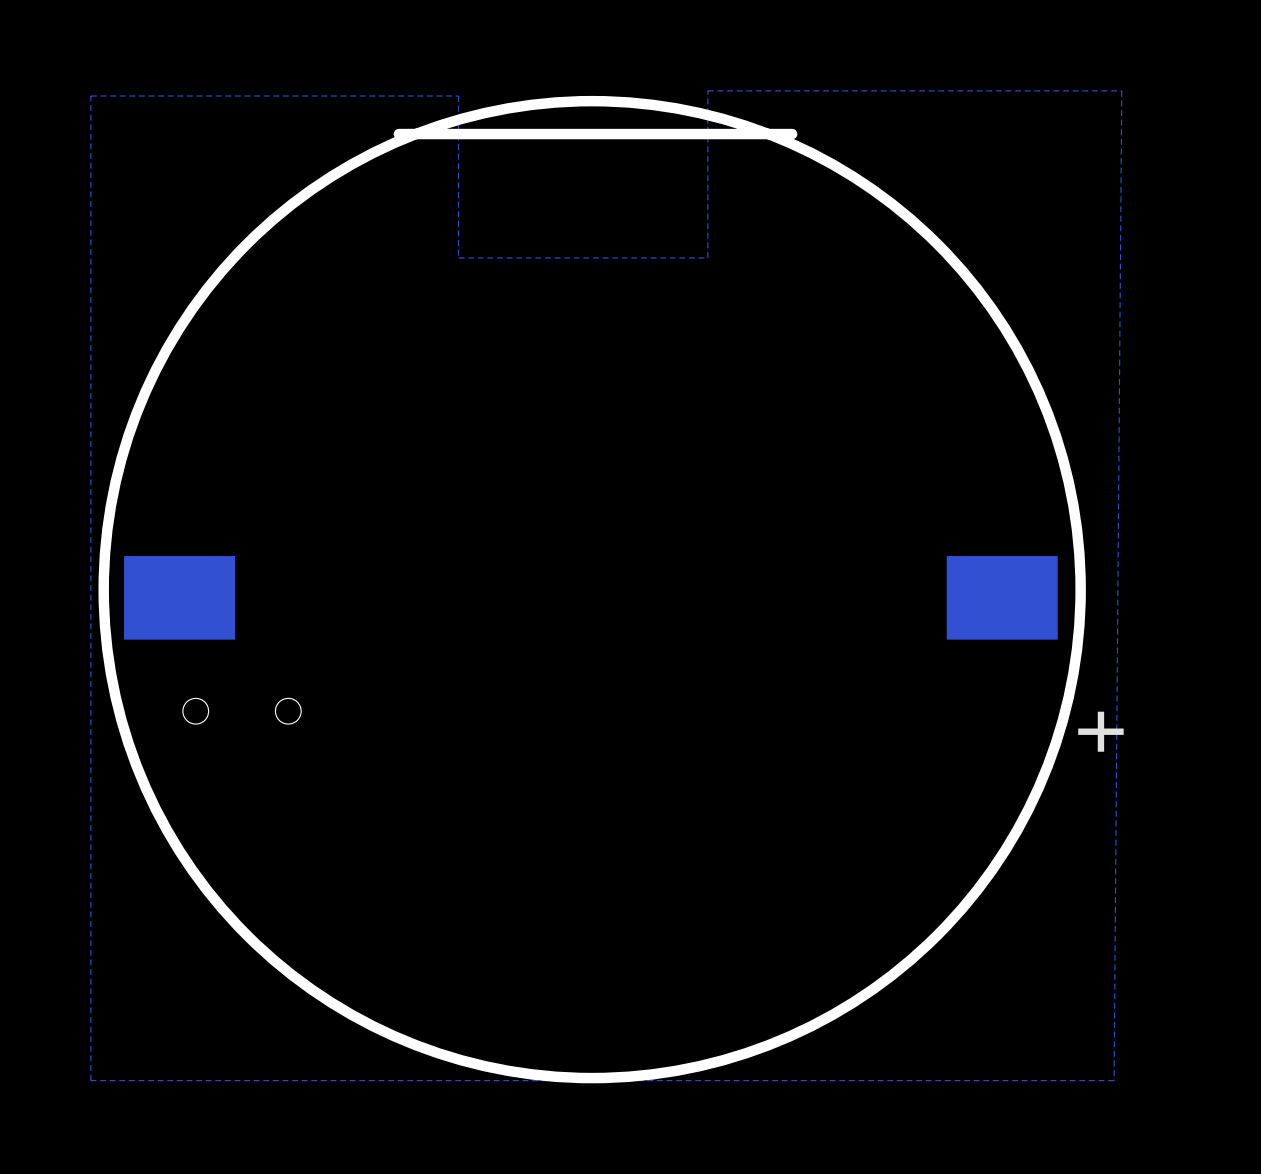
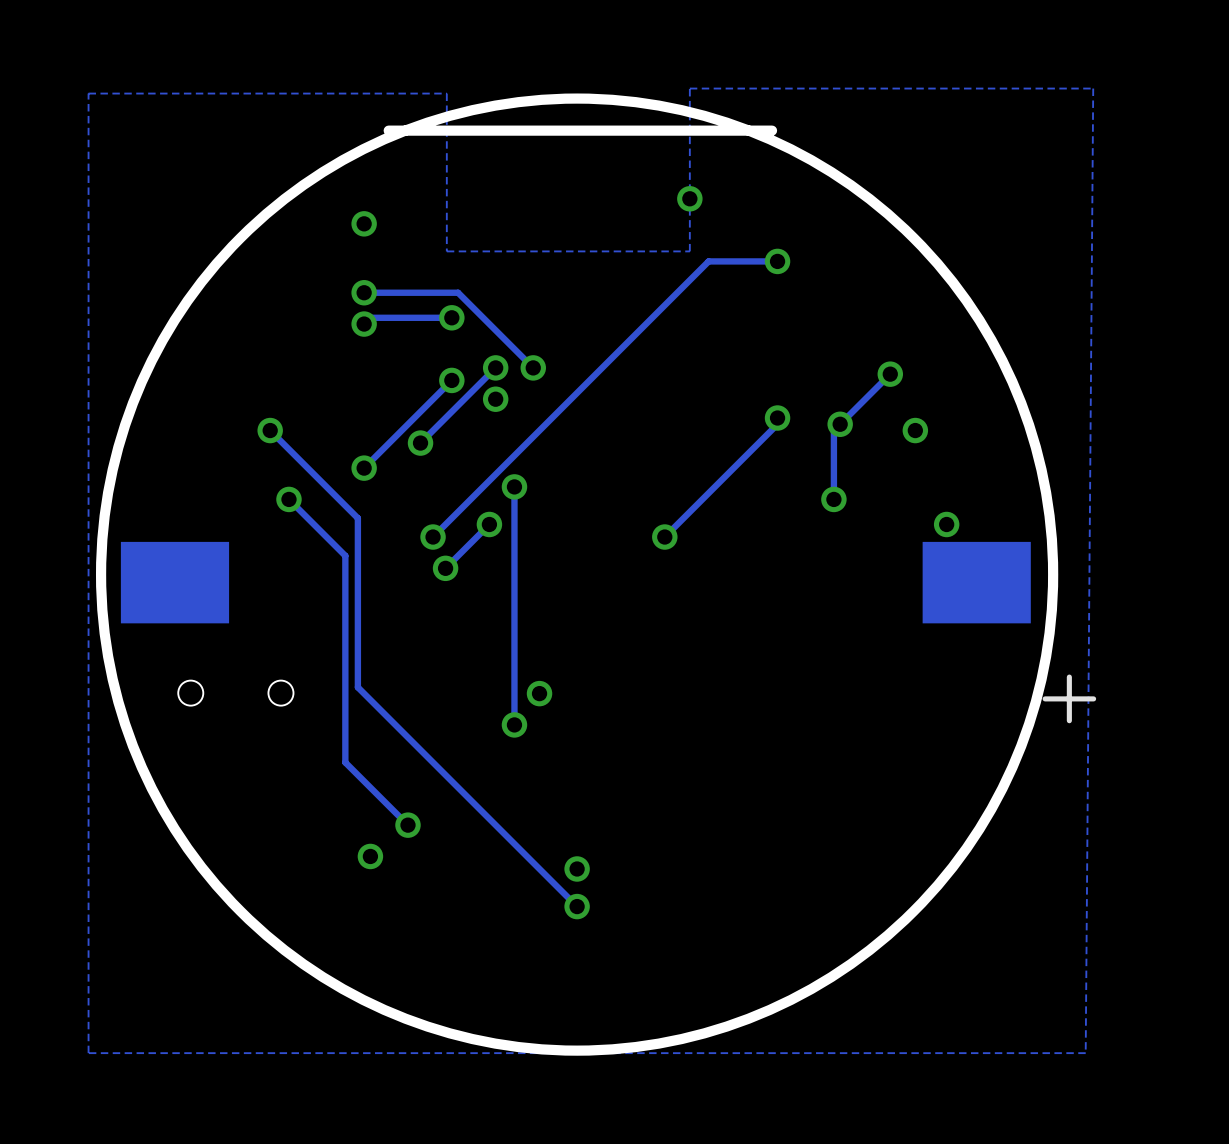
via: none -> (689, 198)
via: none -> (364, 223)
track: none -> (777, 261) (708, 261) (433, 537)
via: none -> (777, 261)
track: none -> (364, 292) (458, 292) (533, 367)
via: none -> (364, 292)
track: none -> (451, 317) (370, 317) (364, 324)
via: none -> (451, 317)
via: none -> (364, 324)
track: none -> (495, 367) (420, 443)
via: none -> (495, 367)
via: none -> (533, 367)
track: none -> (890, 374) (833, 430) (833, 499)
via: none -> (890, 374)
track: none -> (451, 380) (364, 468)
via: none -> (451, 380)
via: none -> (495, 399)
track: none -> (777, 418) (777, 424) (664, 537)
via: none -> (777, 418)
via: none -> (840, 424)
track: none -> (270, 430) (357, 518) (357, 687) (577, 906)
via: none -> (270, 430)
via: none -> (915, 430)
via: none -> (420, 443)
via: none -> (364, 468)
track: none -> (514, 486) (514, 724)
via: none -> (514, 486)
track: none -> (288, 499) (345, 555) (345, 762) (407, 825)
via: none -> (288, 499)
via: none -> (833, 499)
track: none -> (489, 524) (445, 568)
via: none -> (489, 524)
via: none -> (946, 524)
via: none -> (433, 537)
via: none -> (664, 537)
via: none -> (445, 568)
via: none -> (539, 693)
via: none -> (514, 724)
via: none -> (407, 825)
via: none -> (370, 856)
via: none -> (577, 868)
via: none -> (577, 906)

